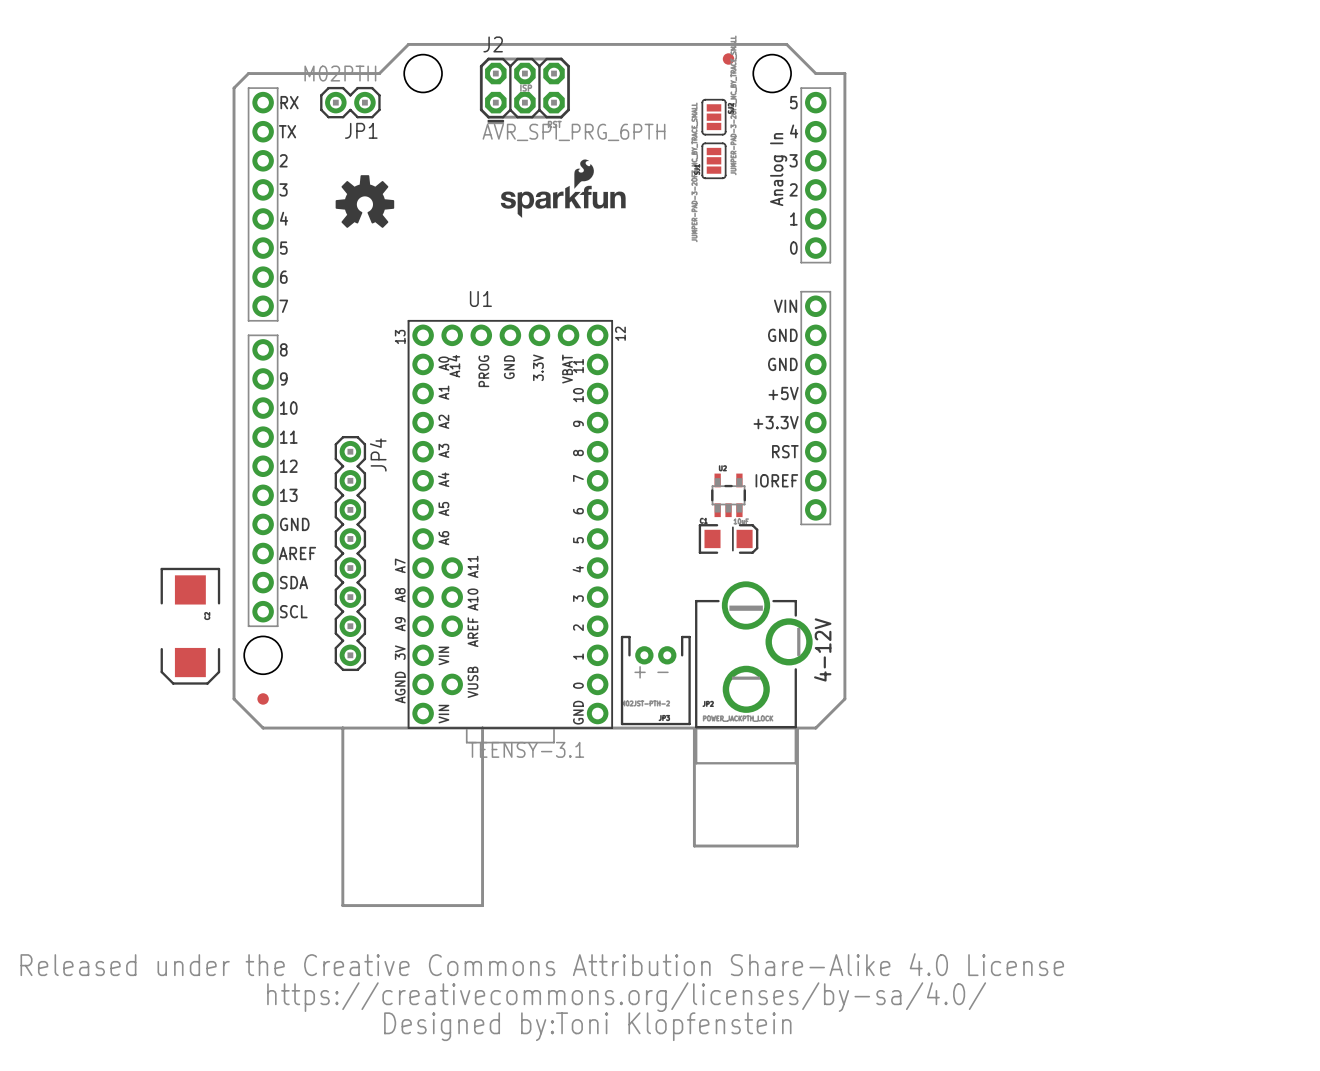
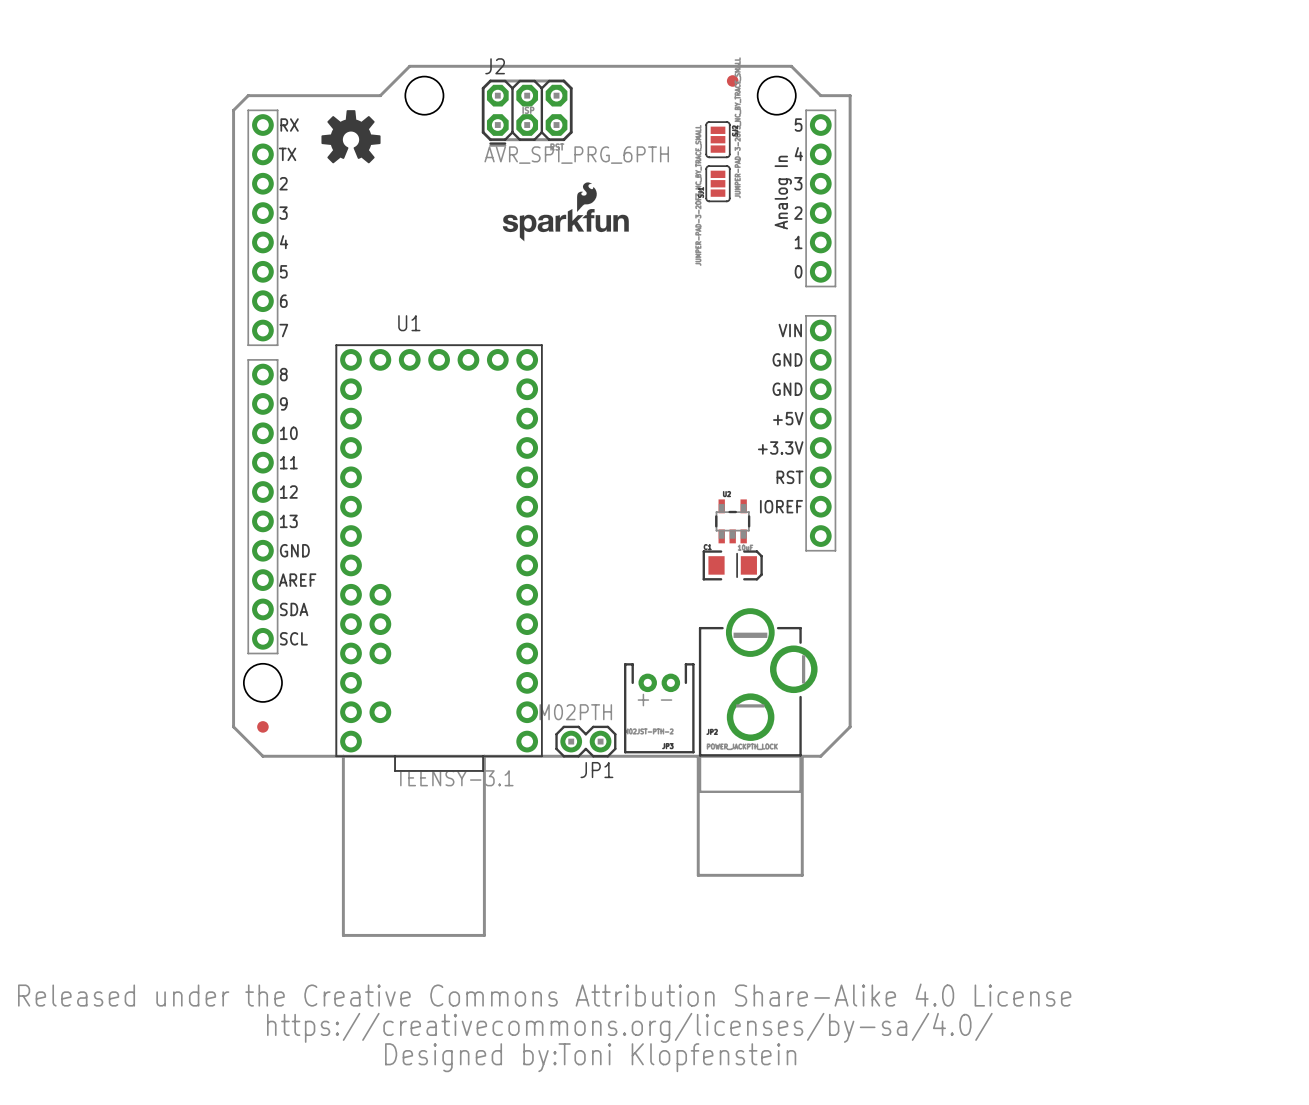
JP1 position: (350, 102) -> (585, 741)
drawing position: (364, 201) -> (351, 136)
U1 footprint: [407, 320, 613, 744] -> [335, 344, 543, 772]
JP4: (350, 553) -> none
part: (190, 626) -> none
text: 4-12V (822, 649) -> none

